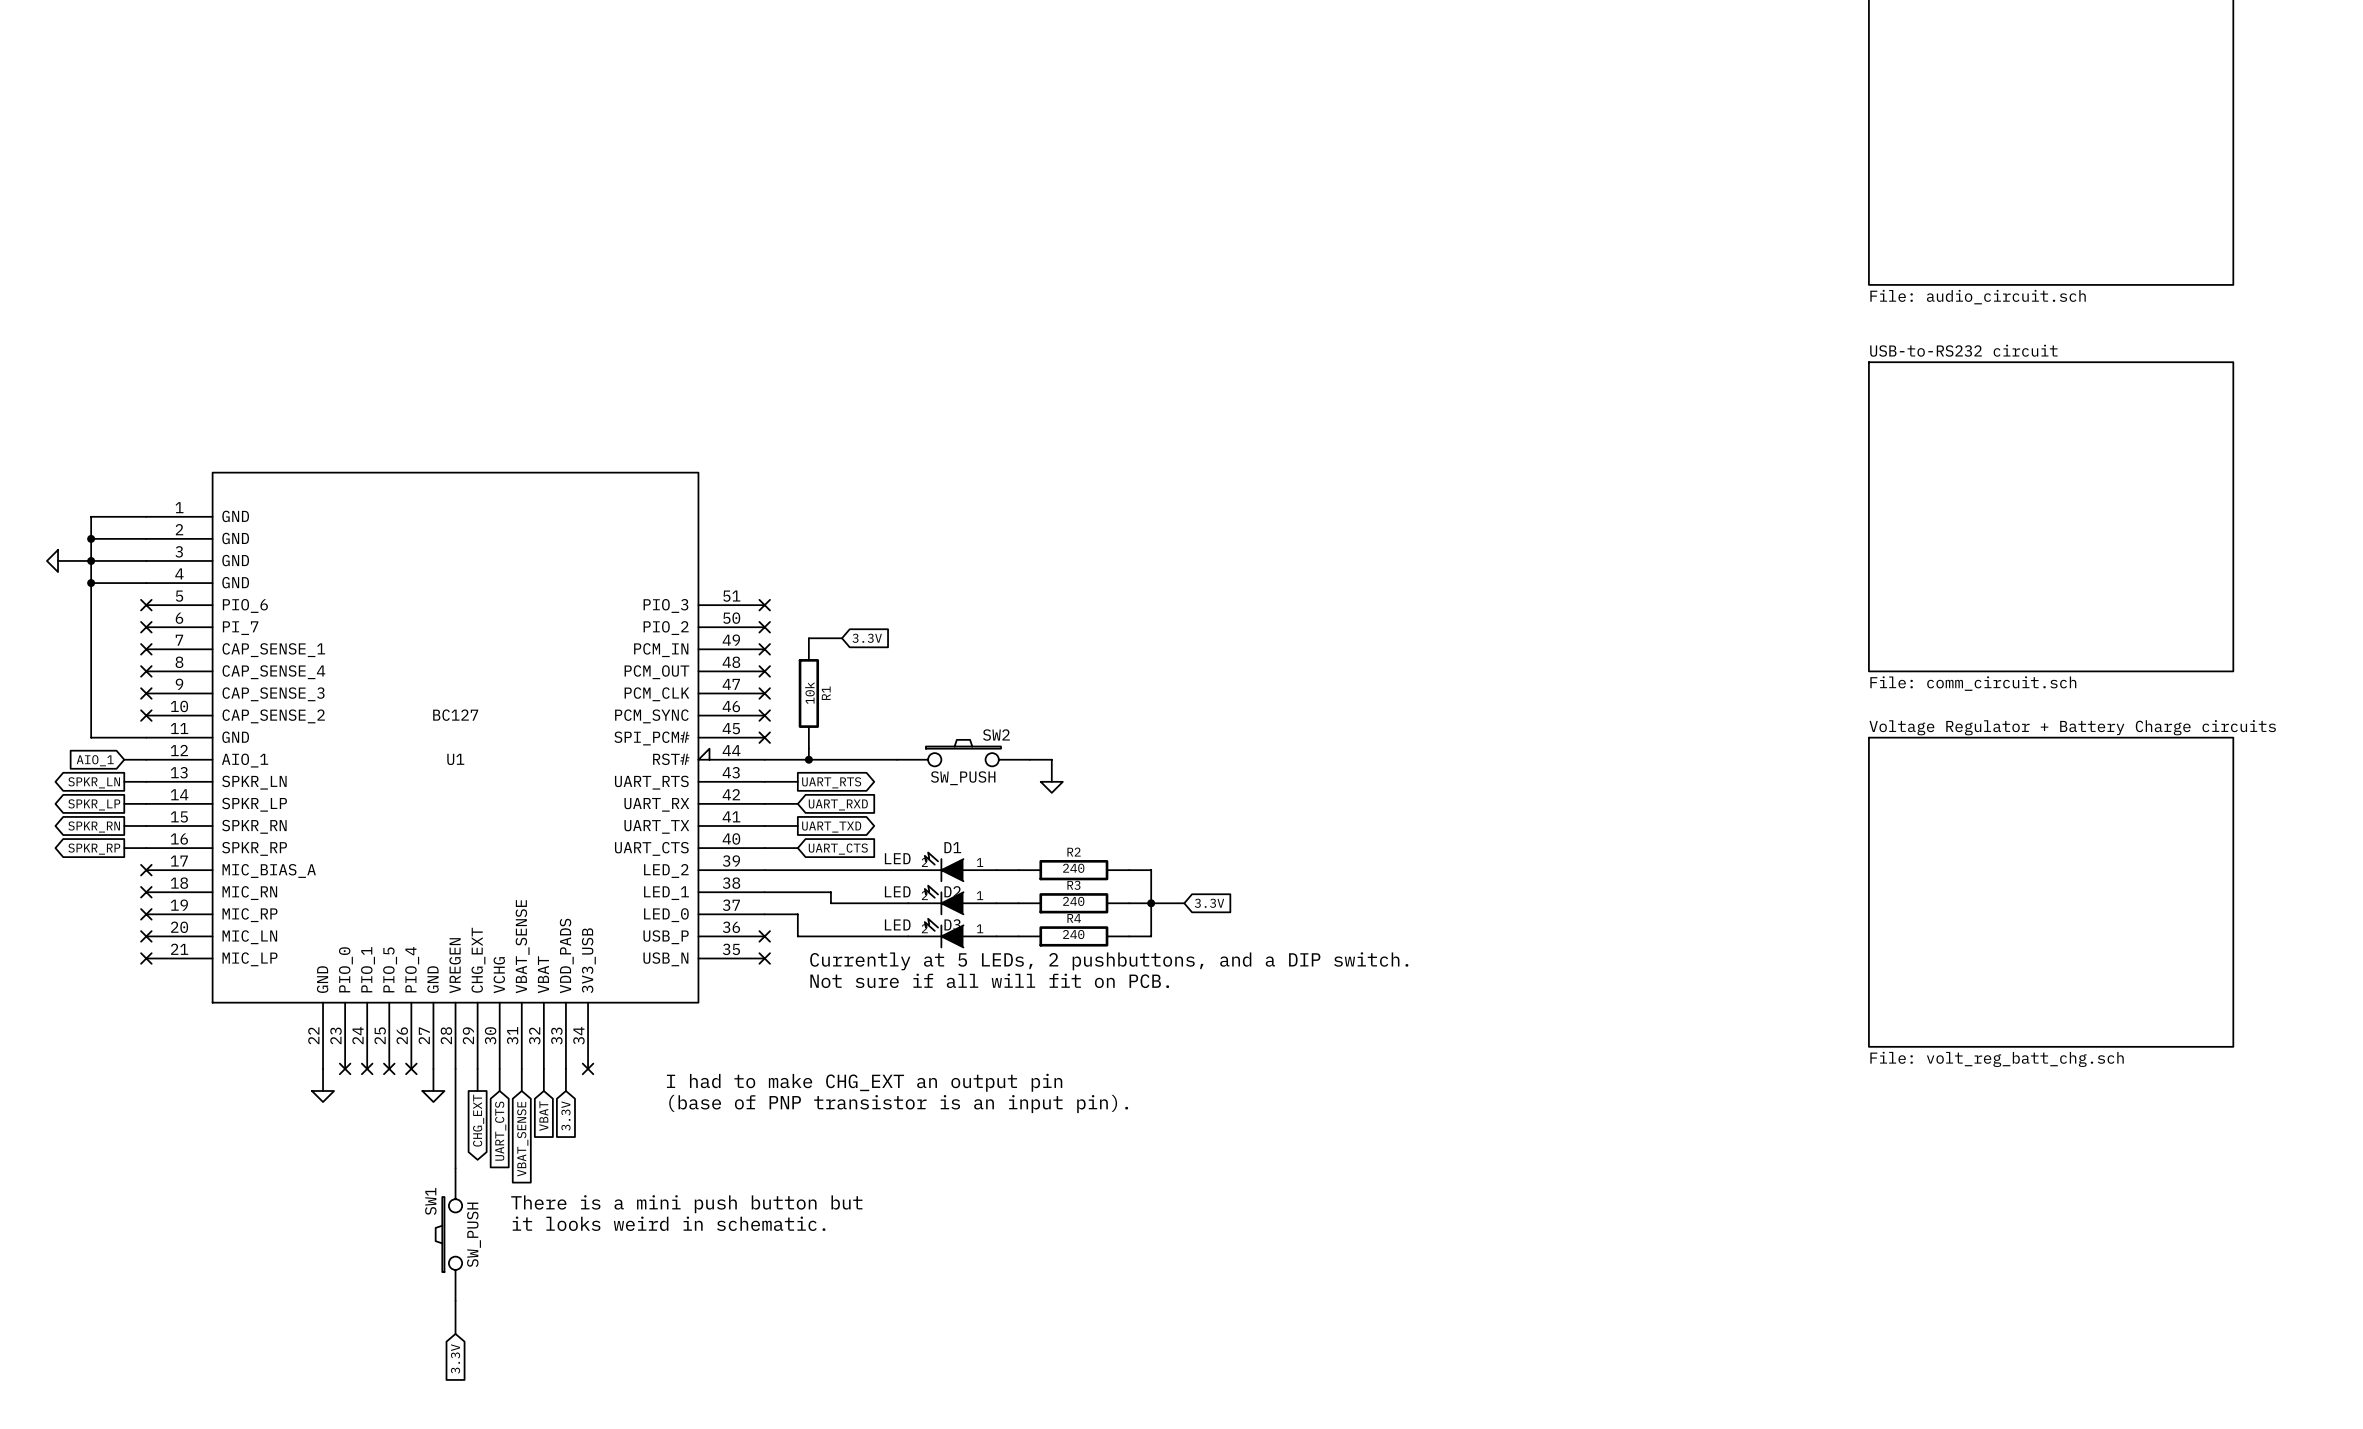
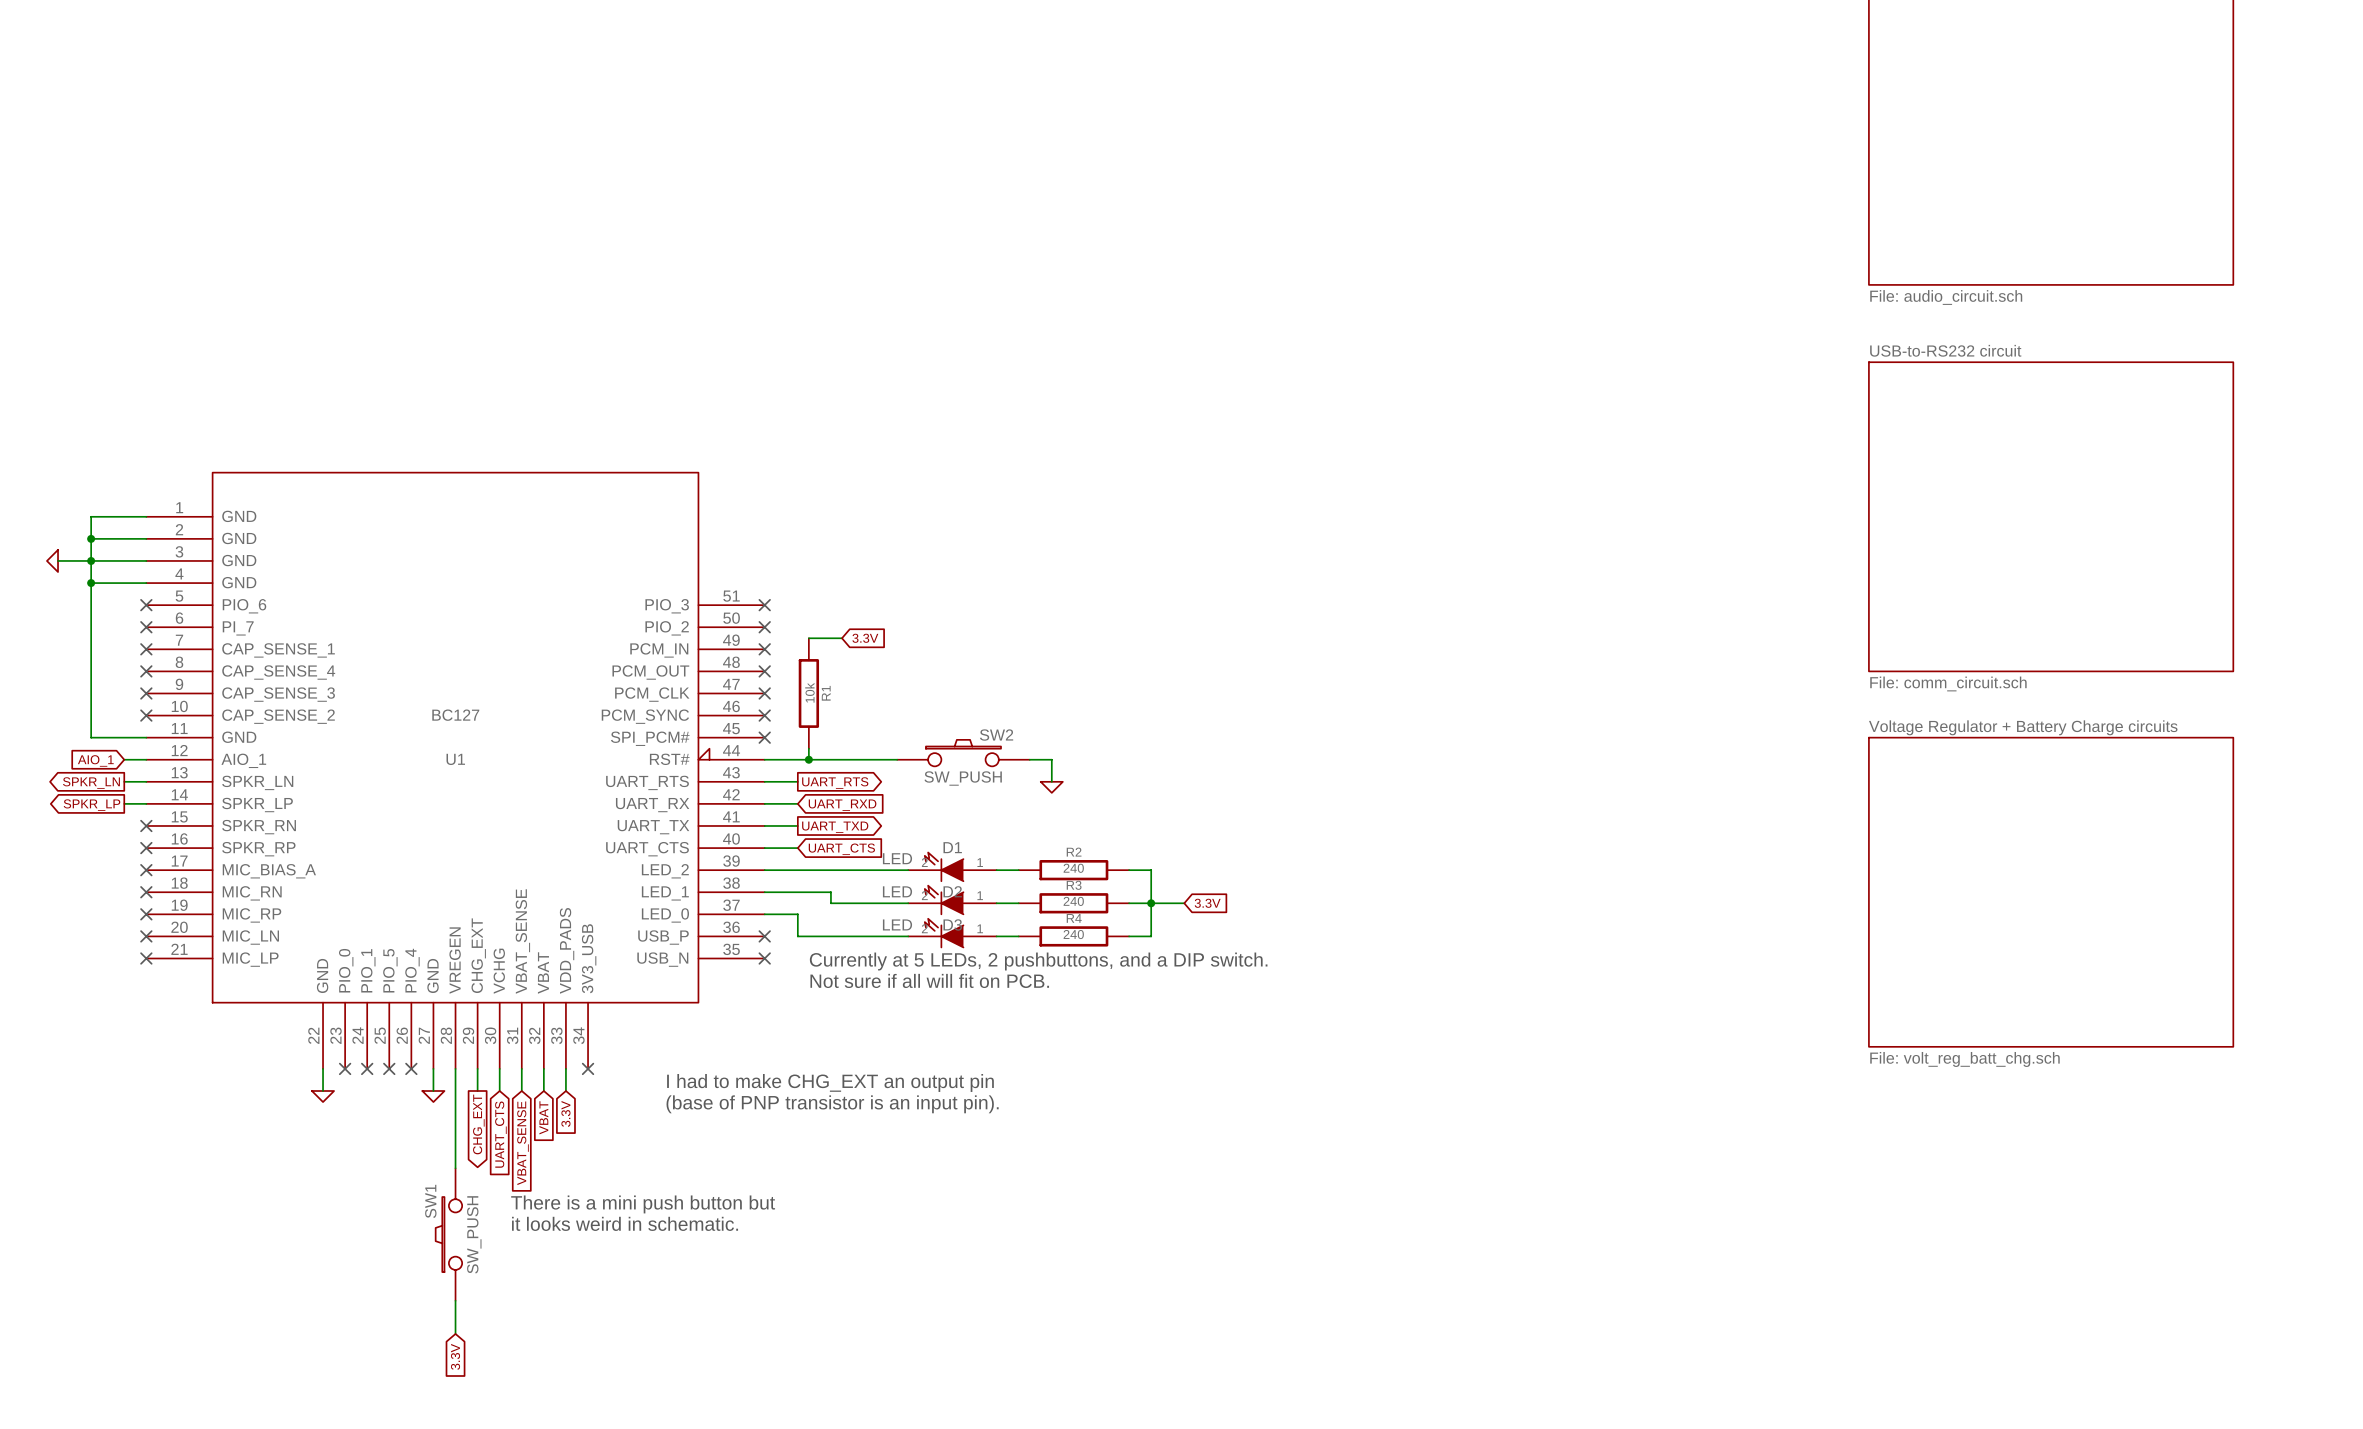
wire: (124, 825) (146, 825) -> none
no-connect mark: none -> (146, 825)
global label: SPKR_RN (94, 826) -> none
wire: (124, 848) (146, 848) -> none
no-connect mark: none -> (146, 848)
global label: SPKR_RP (94, 849) -> none

